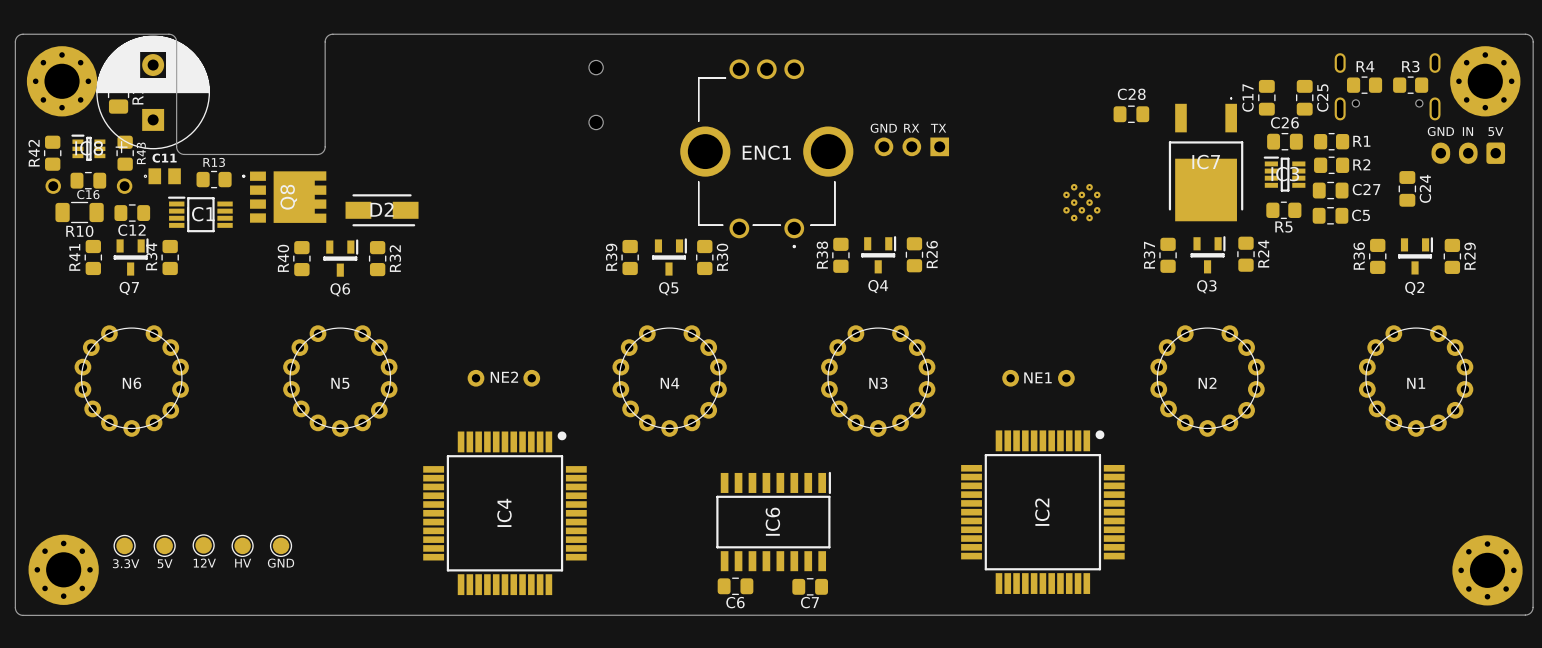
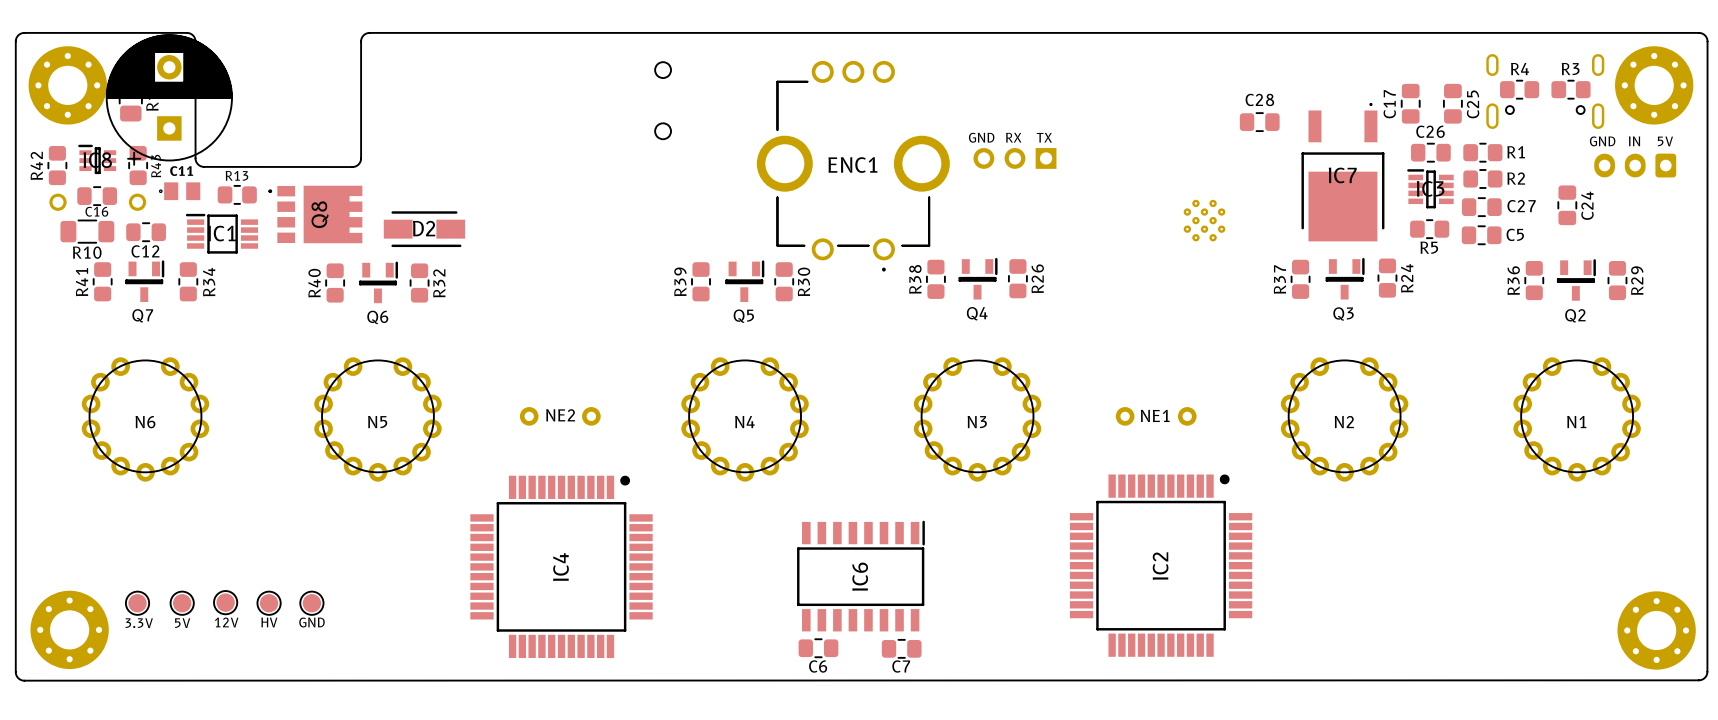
R34 name position: R34 (151, 256) -> R34 (209, 282)

